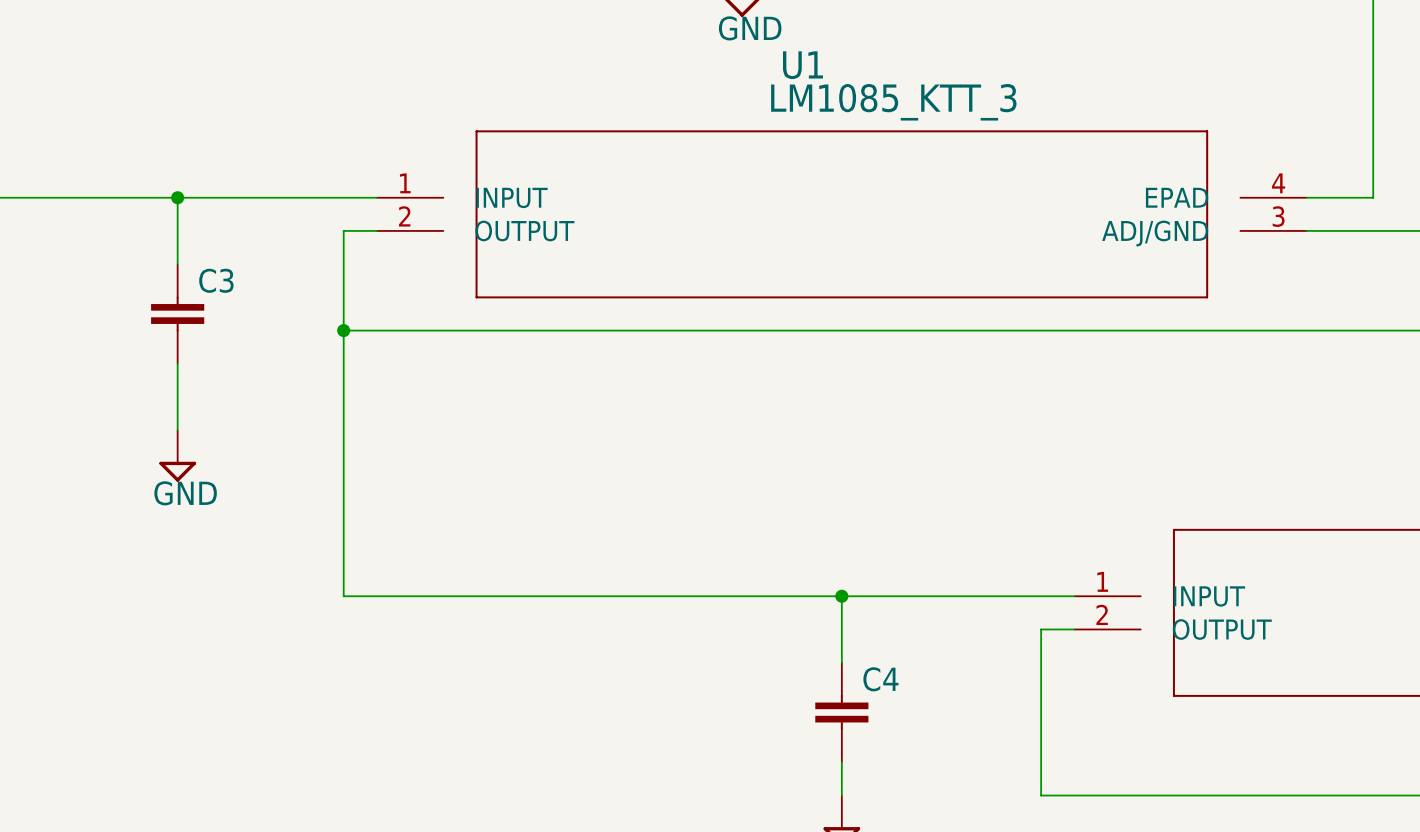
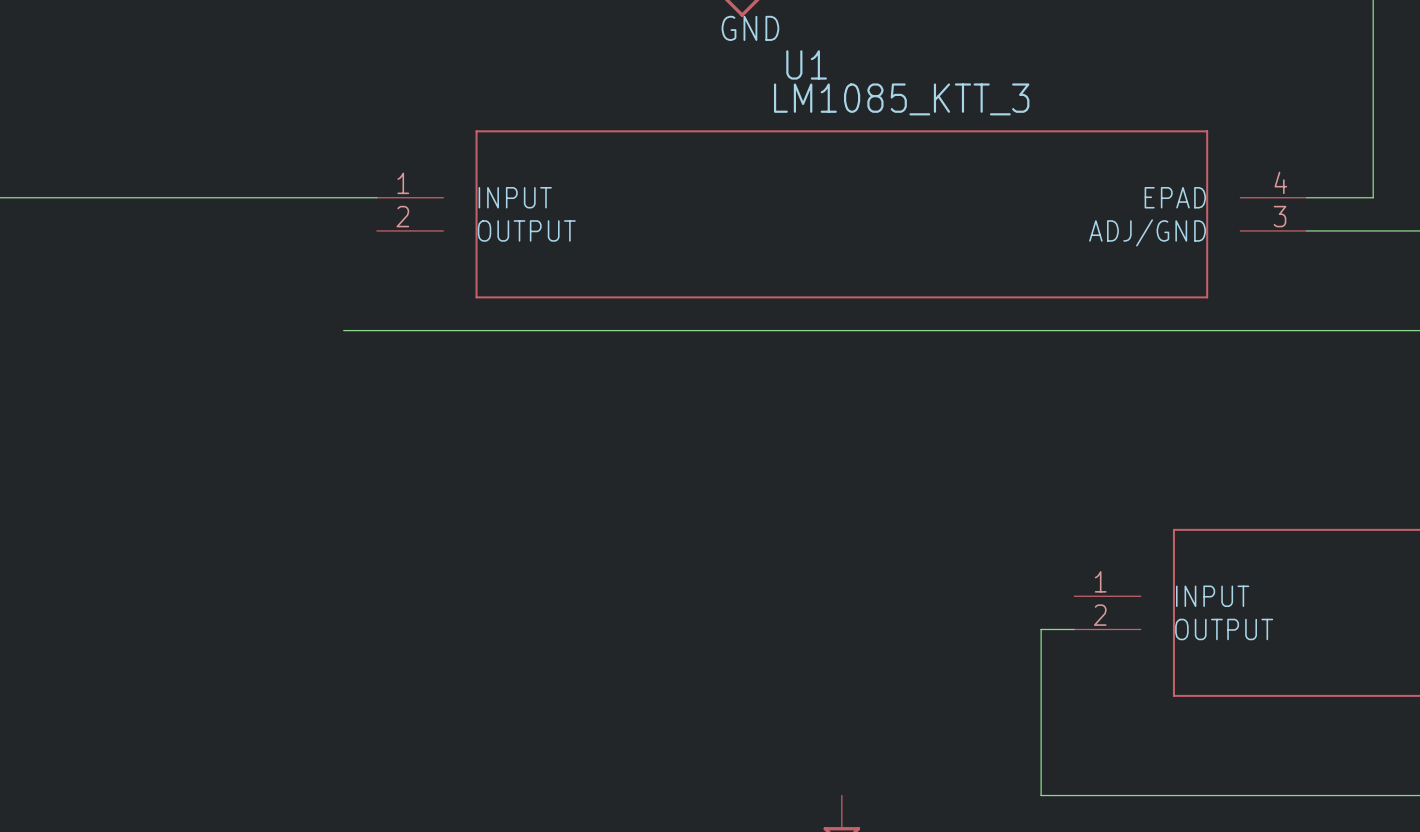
wire: (177, 197) (177, 264) -> none
junction: (177, 197) -> none
wire: (376, 230) (343, 230) (343, 596) (1074, 596) -> none
C3: (177, 313) -> none
junction: (343, 330) -> none
wire: (177, 363) (177, 430) -> none
power symbol: GND (177, 455) -> none
wire: (841, 596) (841, 662) -> none
junction: (841, 596) -> none
C4: (841, 712) -> none
wire: (841, 762) (841, 795) -> none

